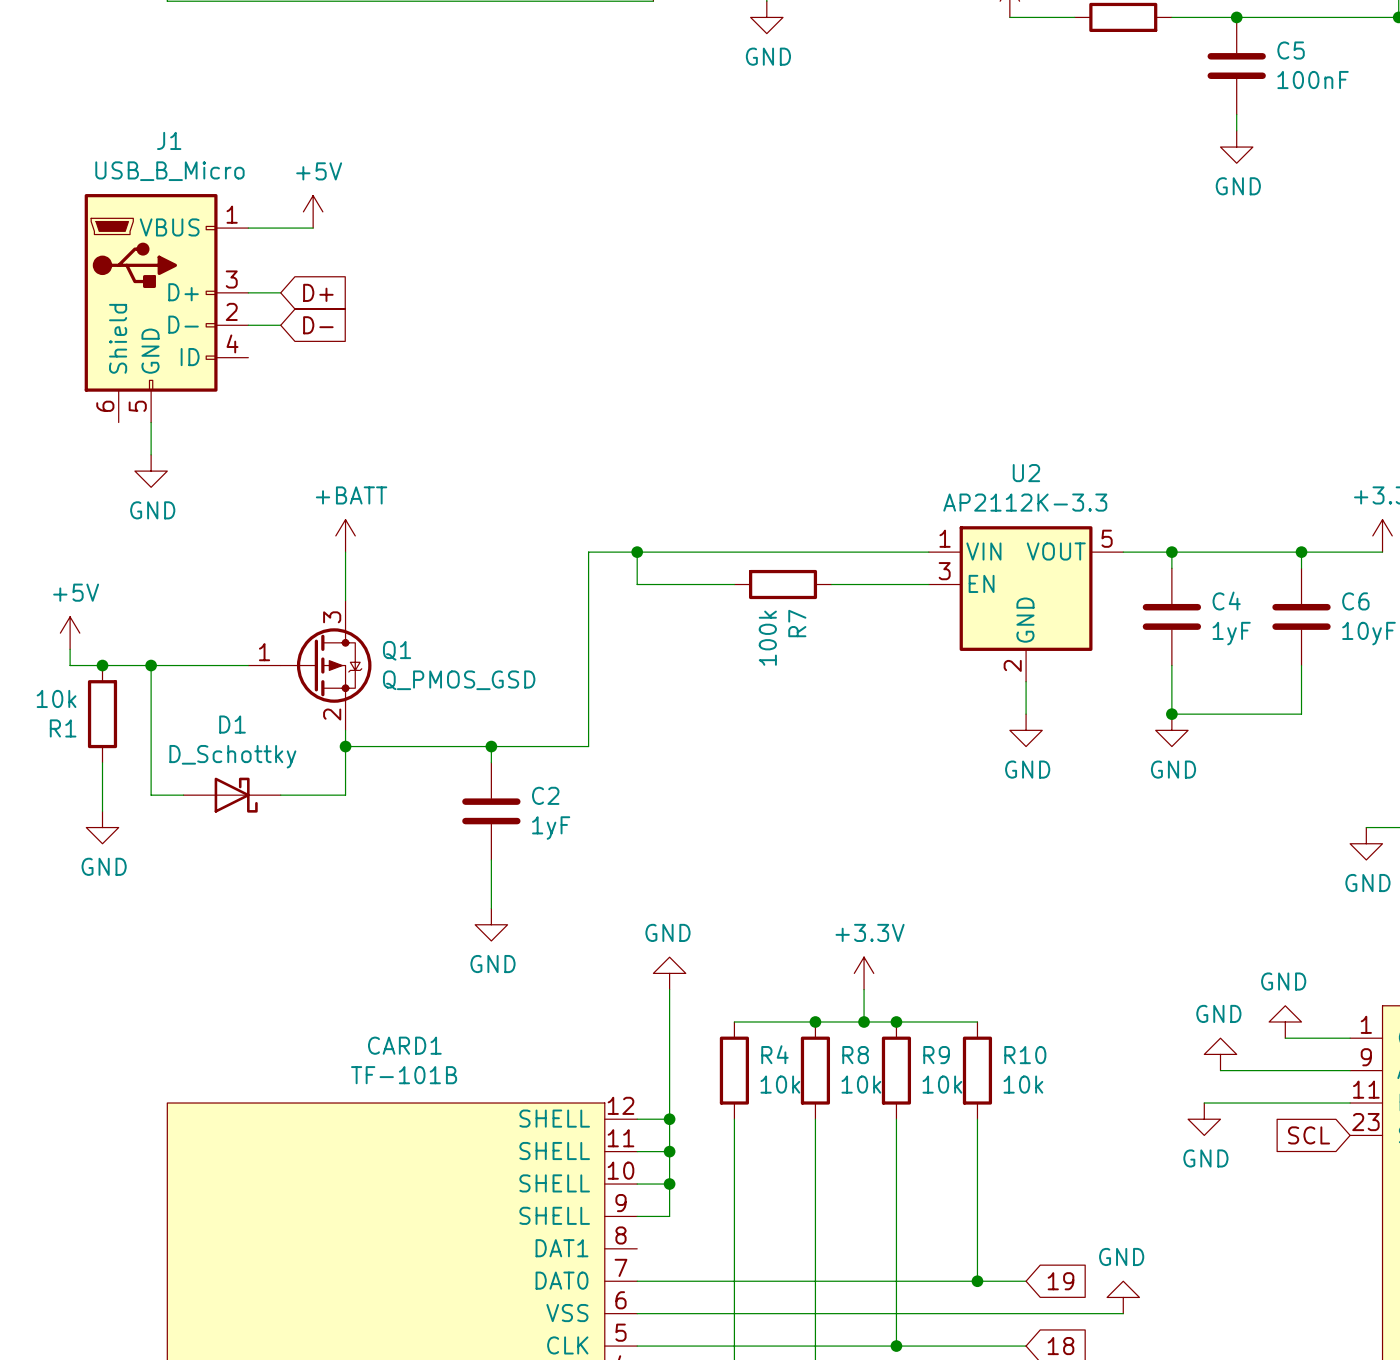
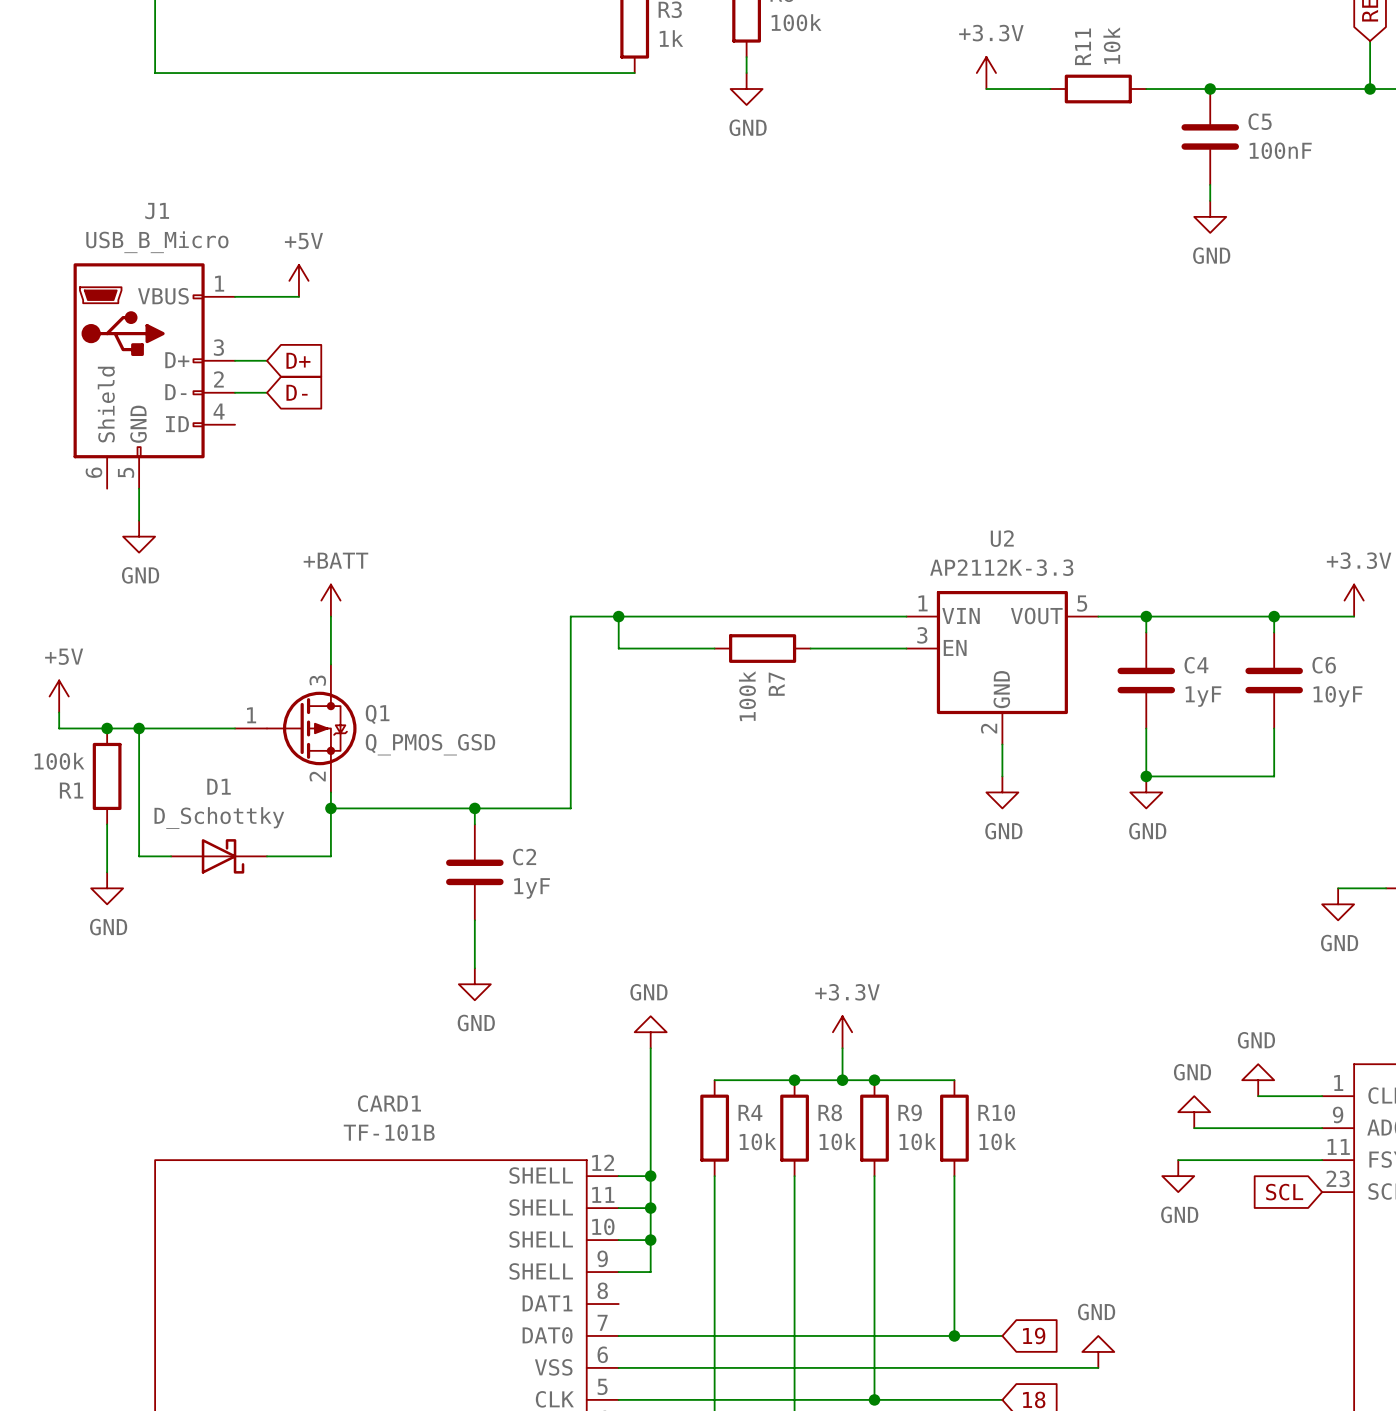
junction position: (102, 665) -> (107, 728)
R1 value: 10k (56, 698) -> 100k (59, 761)
R1 position: (102, 714) -> (107, 776)
wire: (102, 762) (102, 811) -> (107, 824) (107, 872)
power symbol position: GND (102, 827) -> GND (107, 888)

